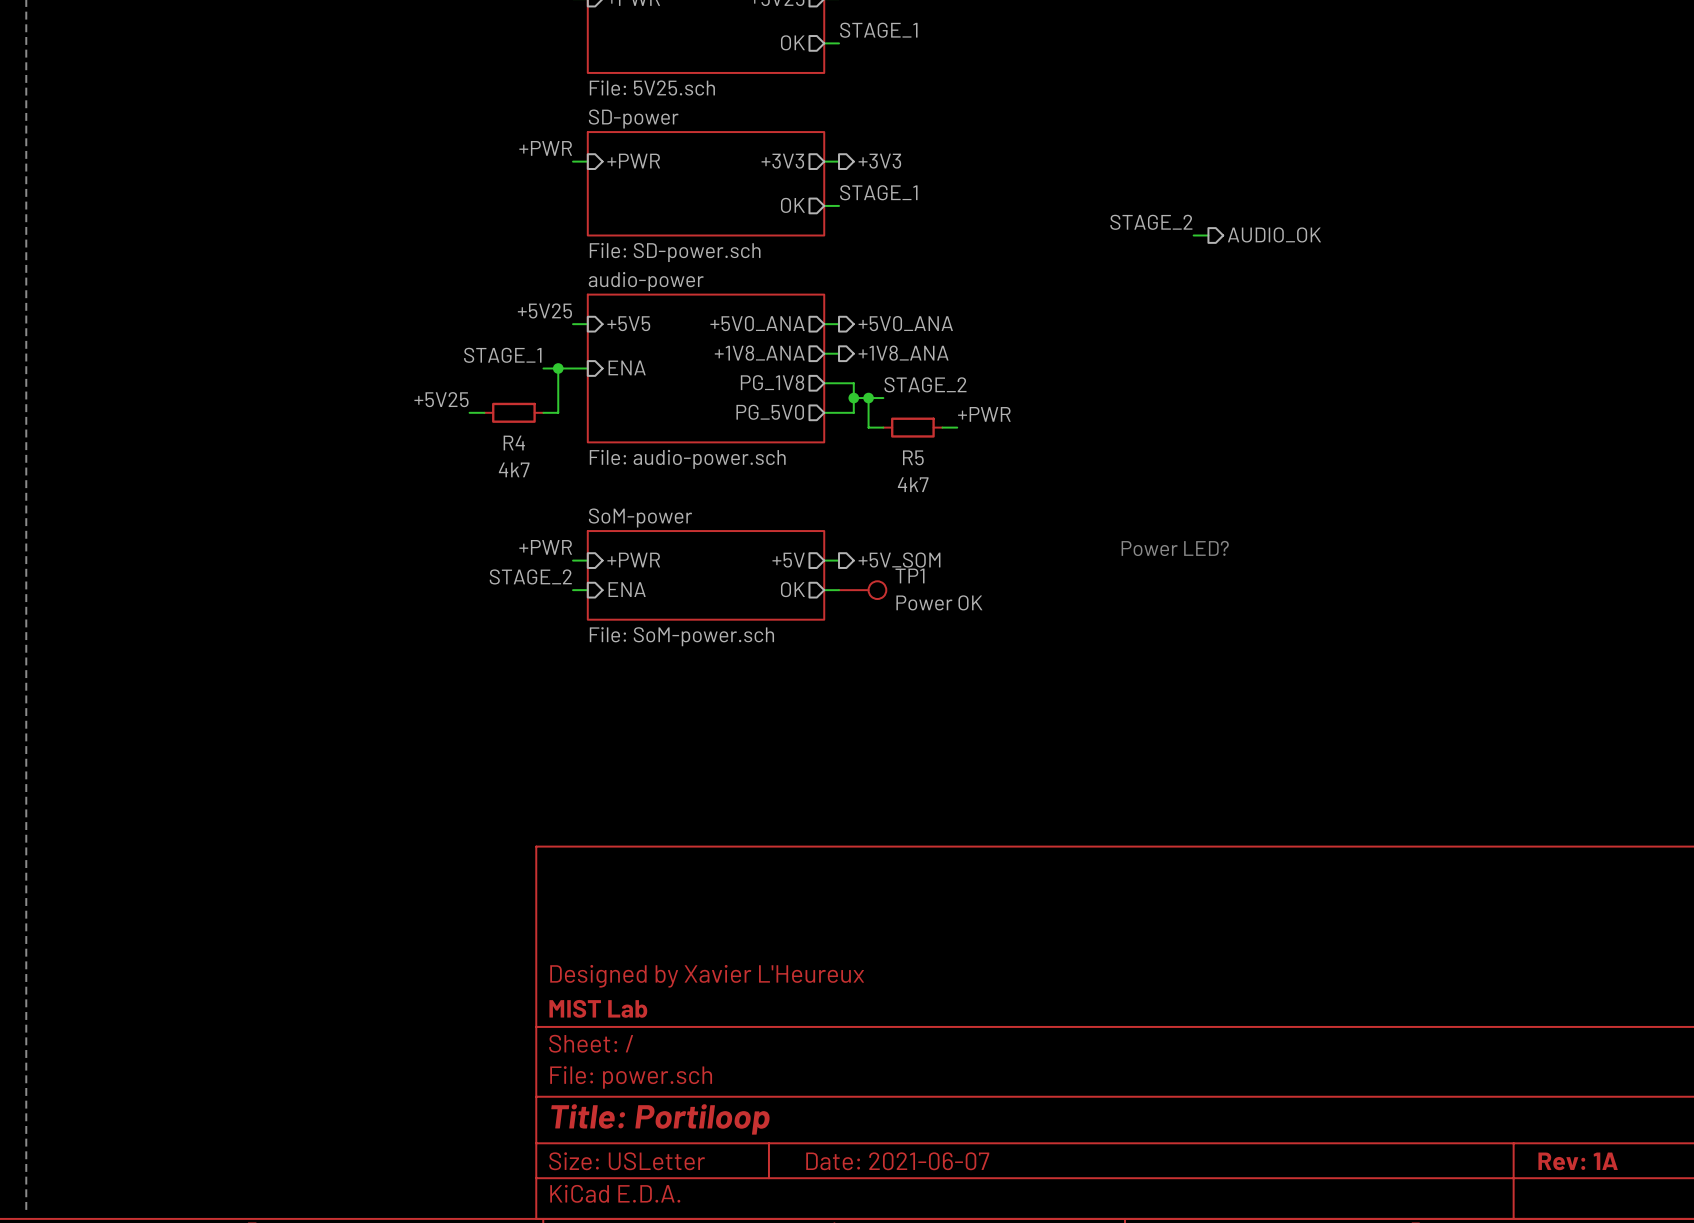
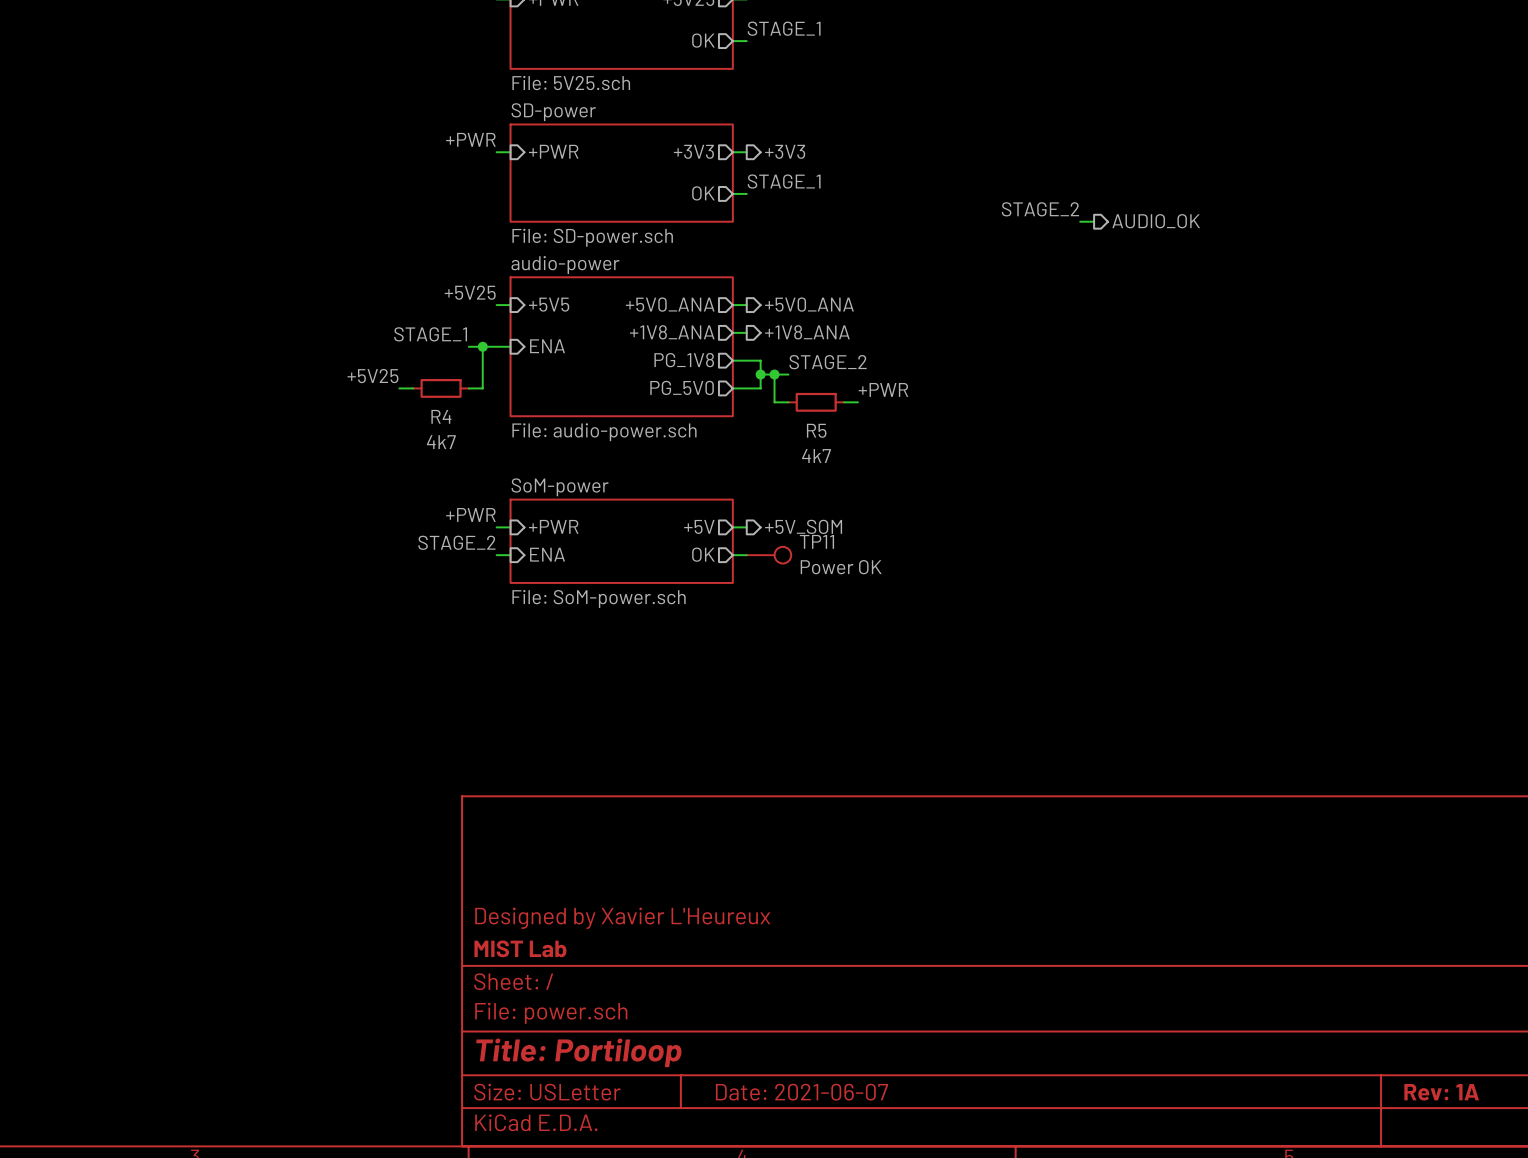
text: Power LED? (1175, 548) -> none
TP1 name: TP1 (909, 575) -> TP11 (816, 541)

